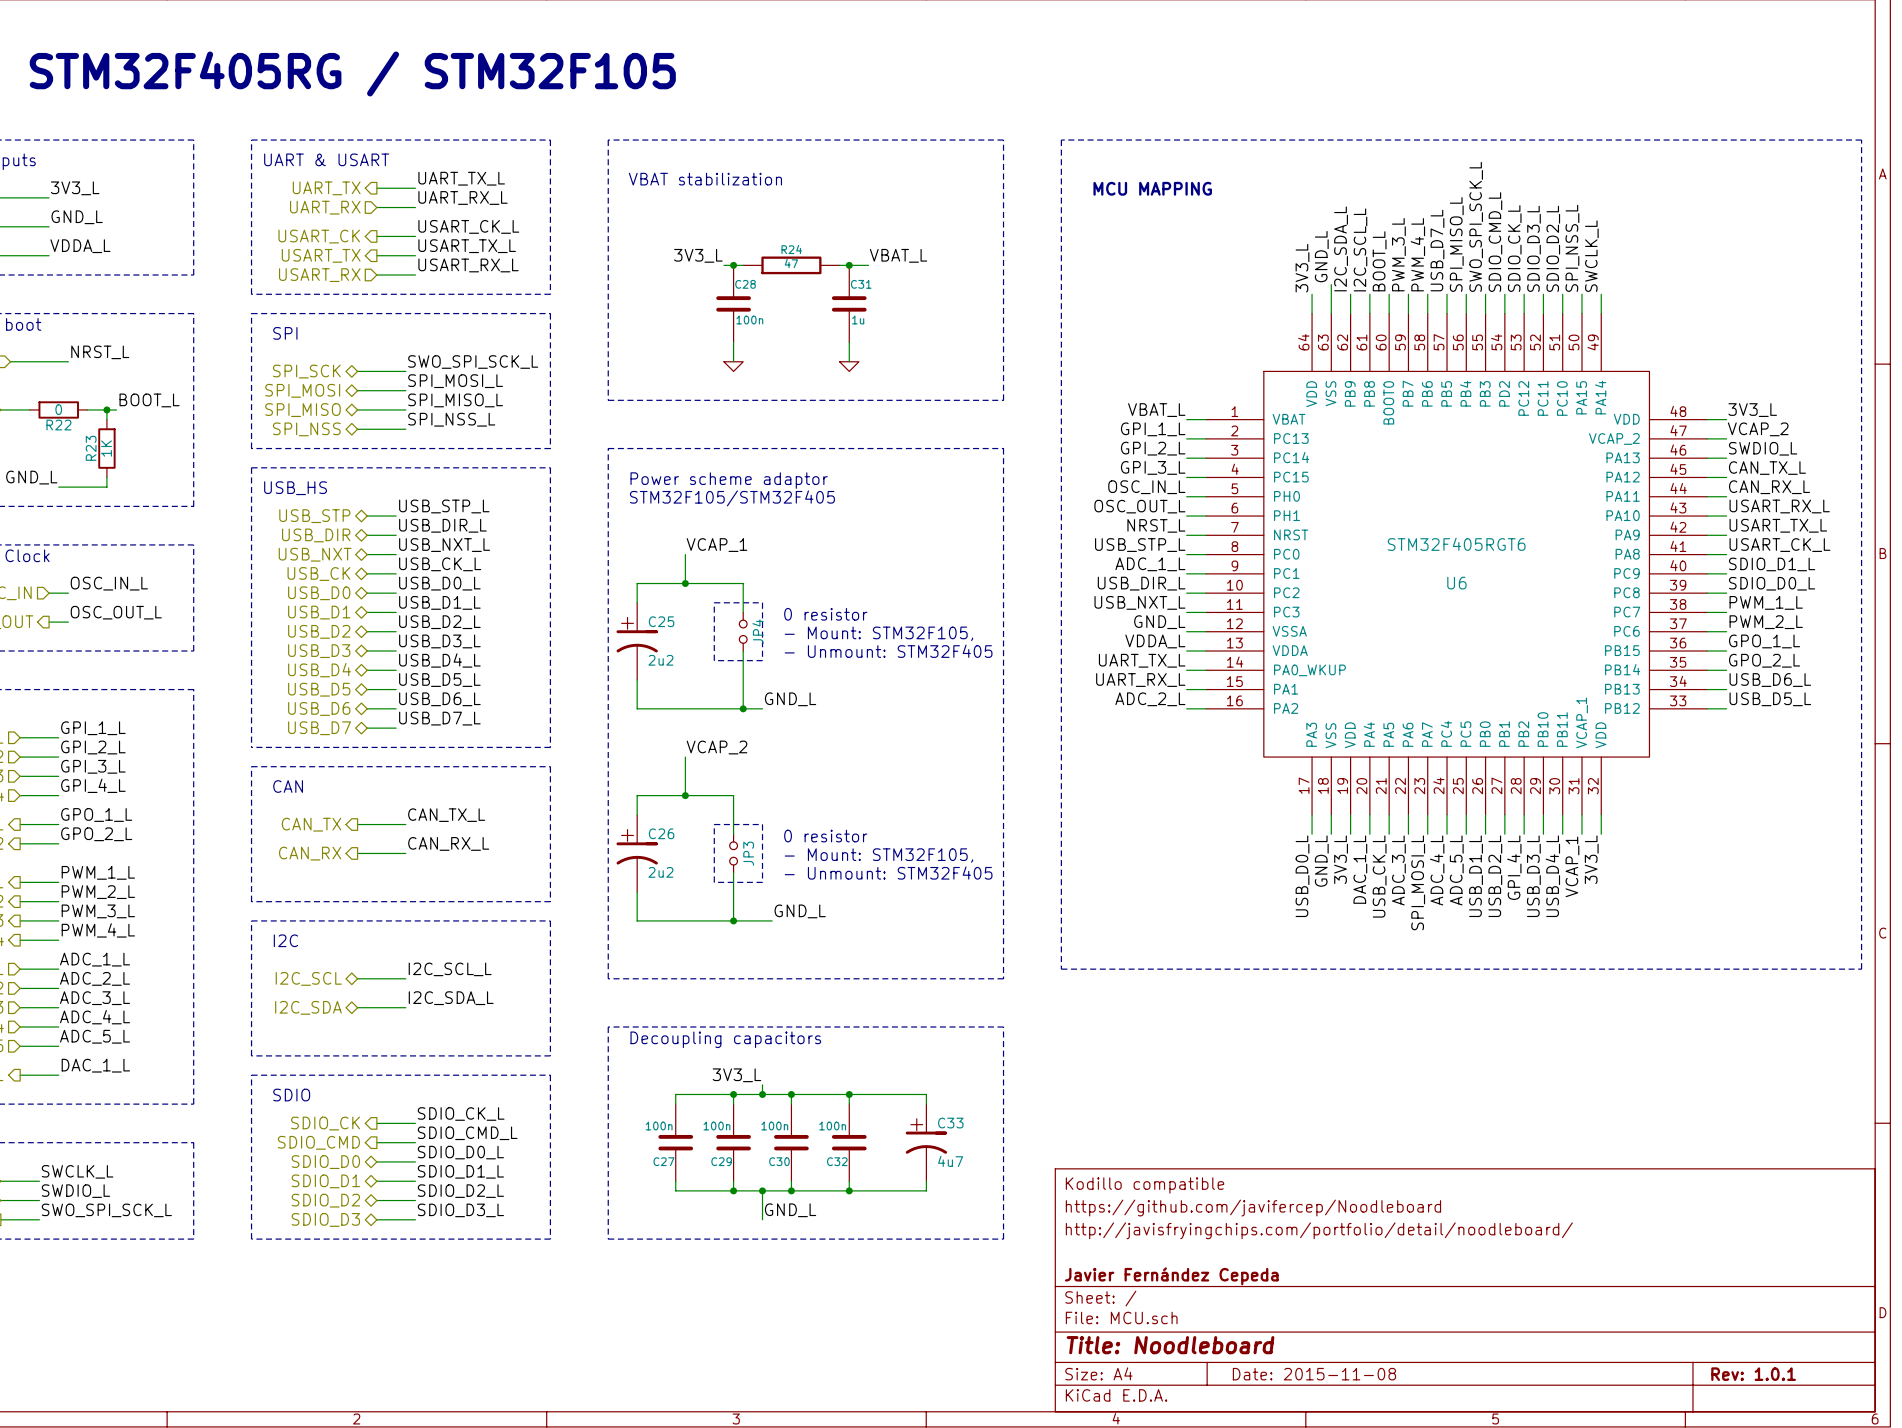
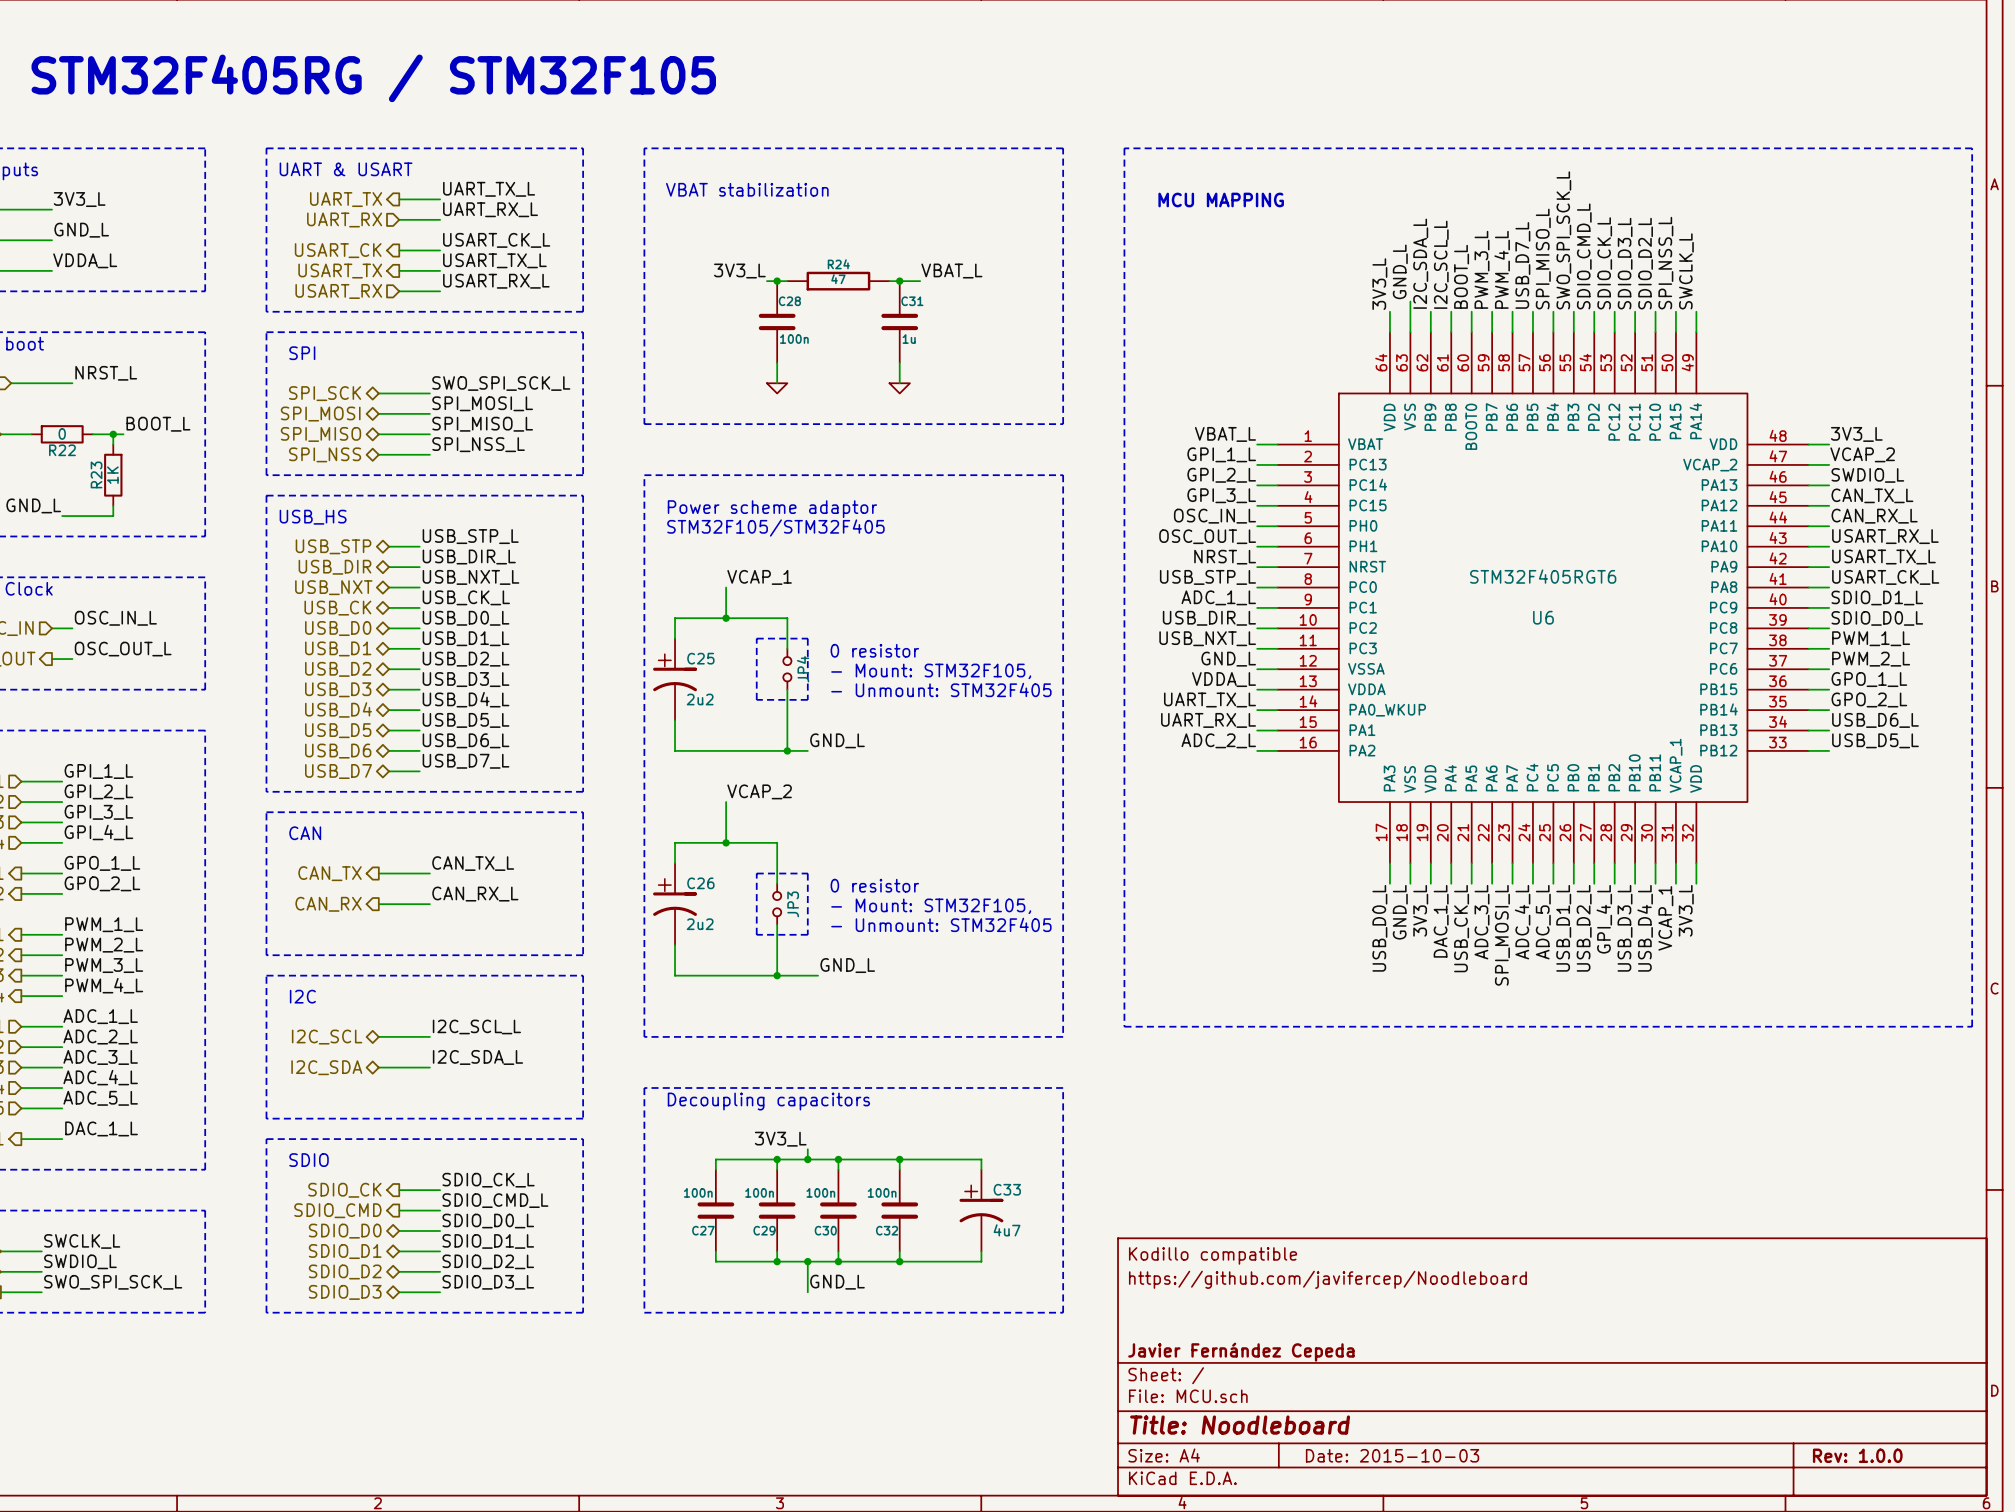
title block: http://javisfryingchips.com/portfolio/detail/noodleboard/ (1319, 1230) -> none
title block: Date: 2015-11-08 (1314, 1374) -> Date: 2015-10-03 (1392, 1455)
title block: Rev: 1.0.1 (1753, 1374) -> Rev: 1.0.0 (1857, 1455)

